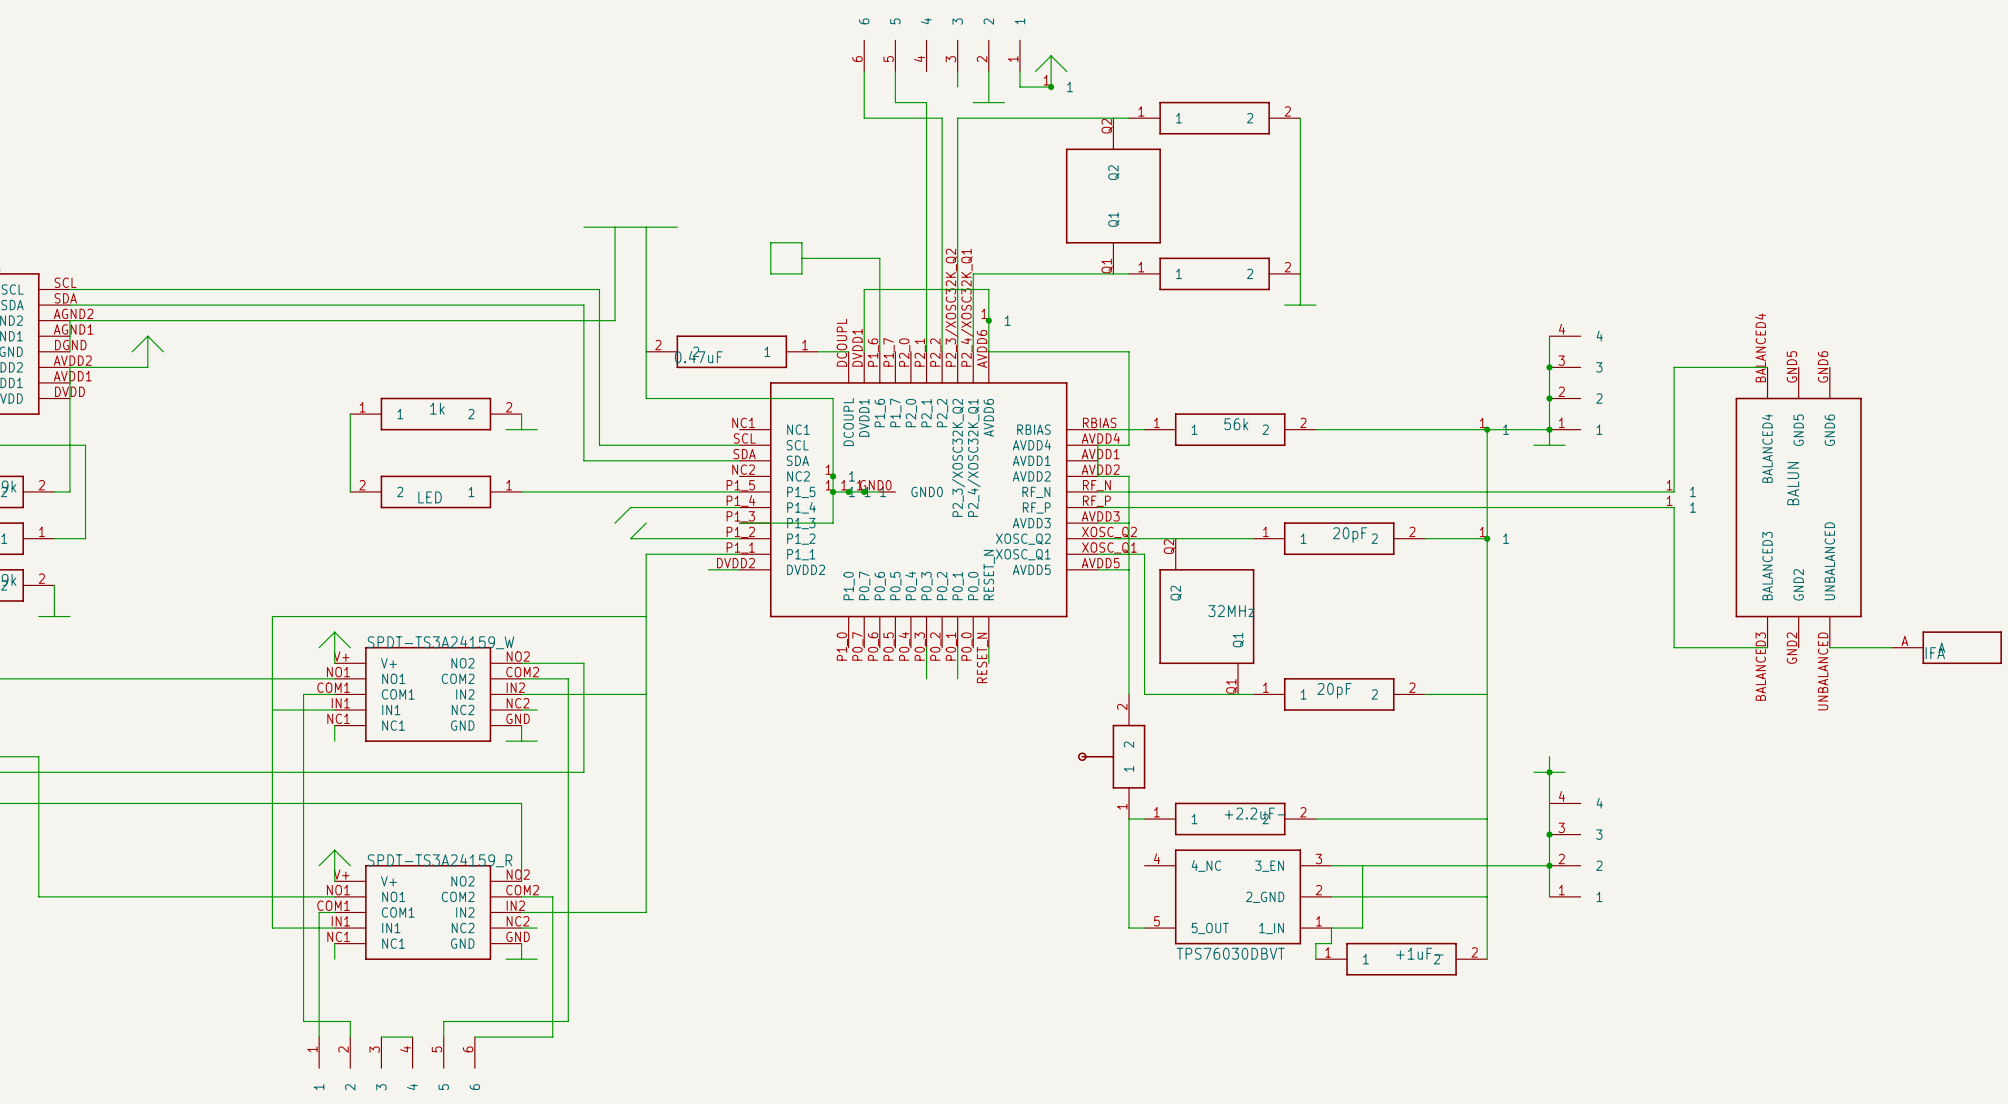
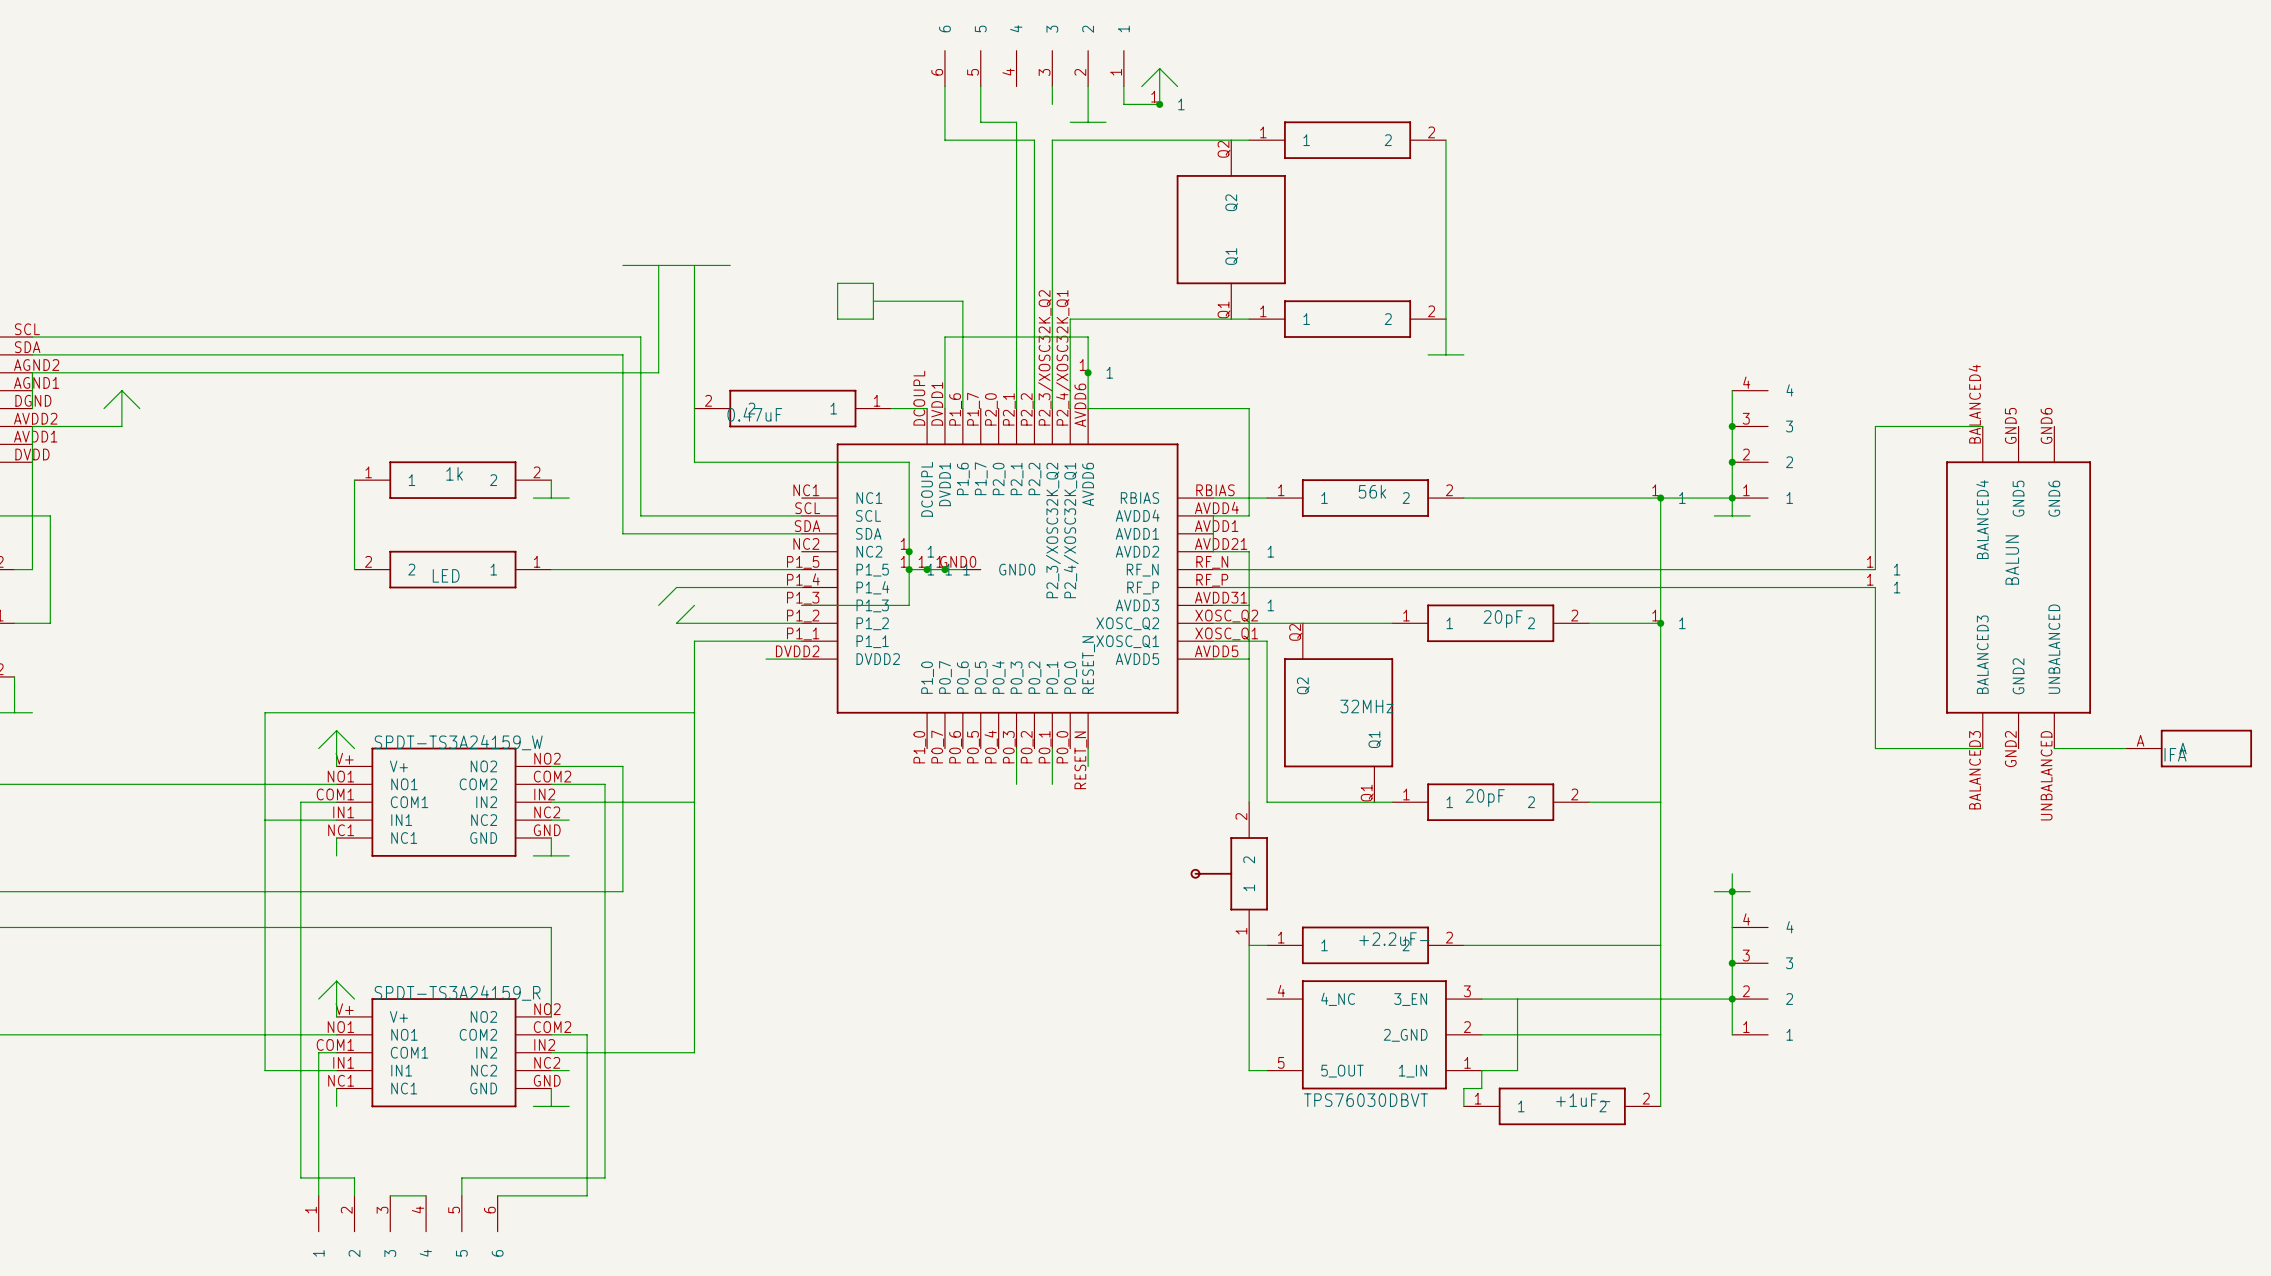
part: none -> (1257, 547)
part: none -> (1257, 601)

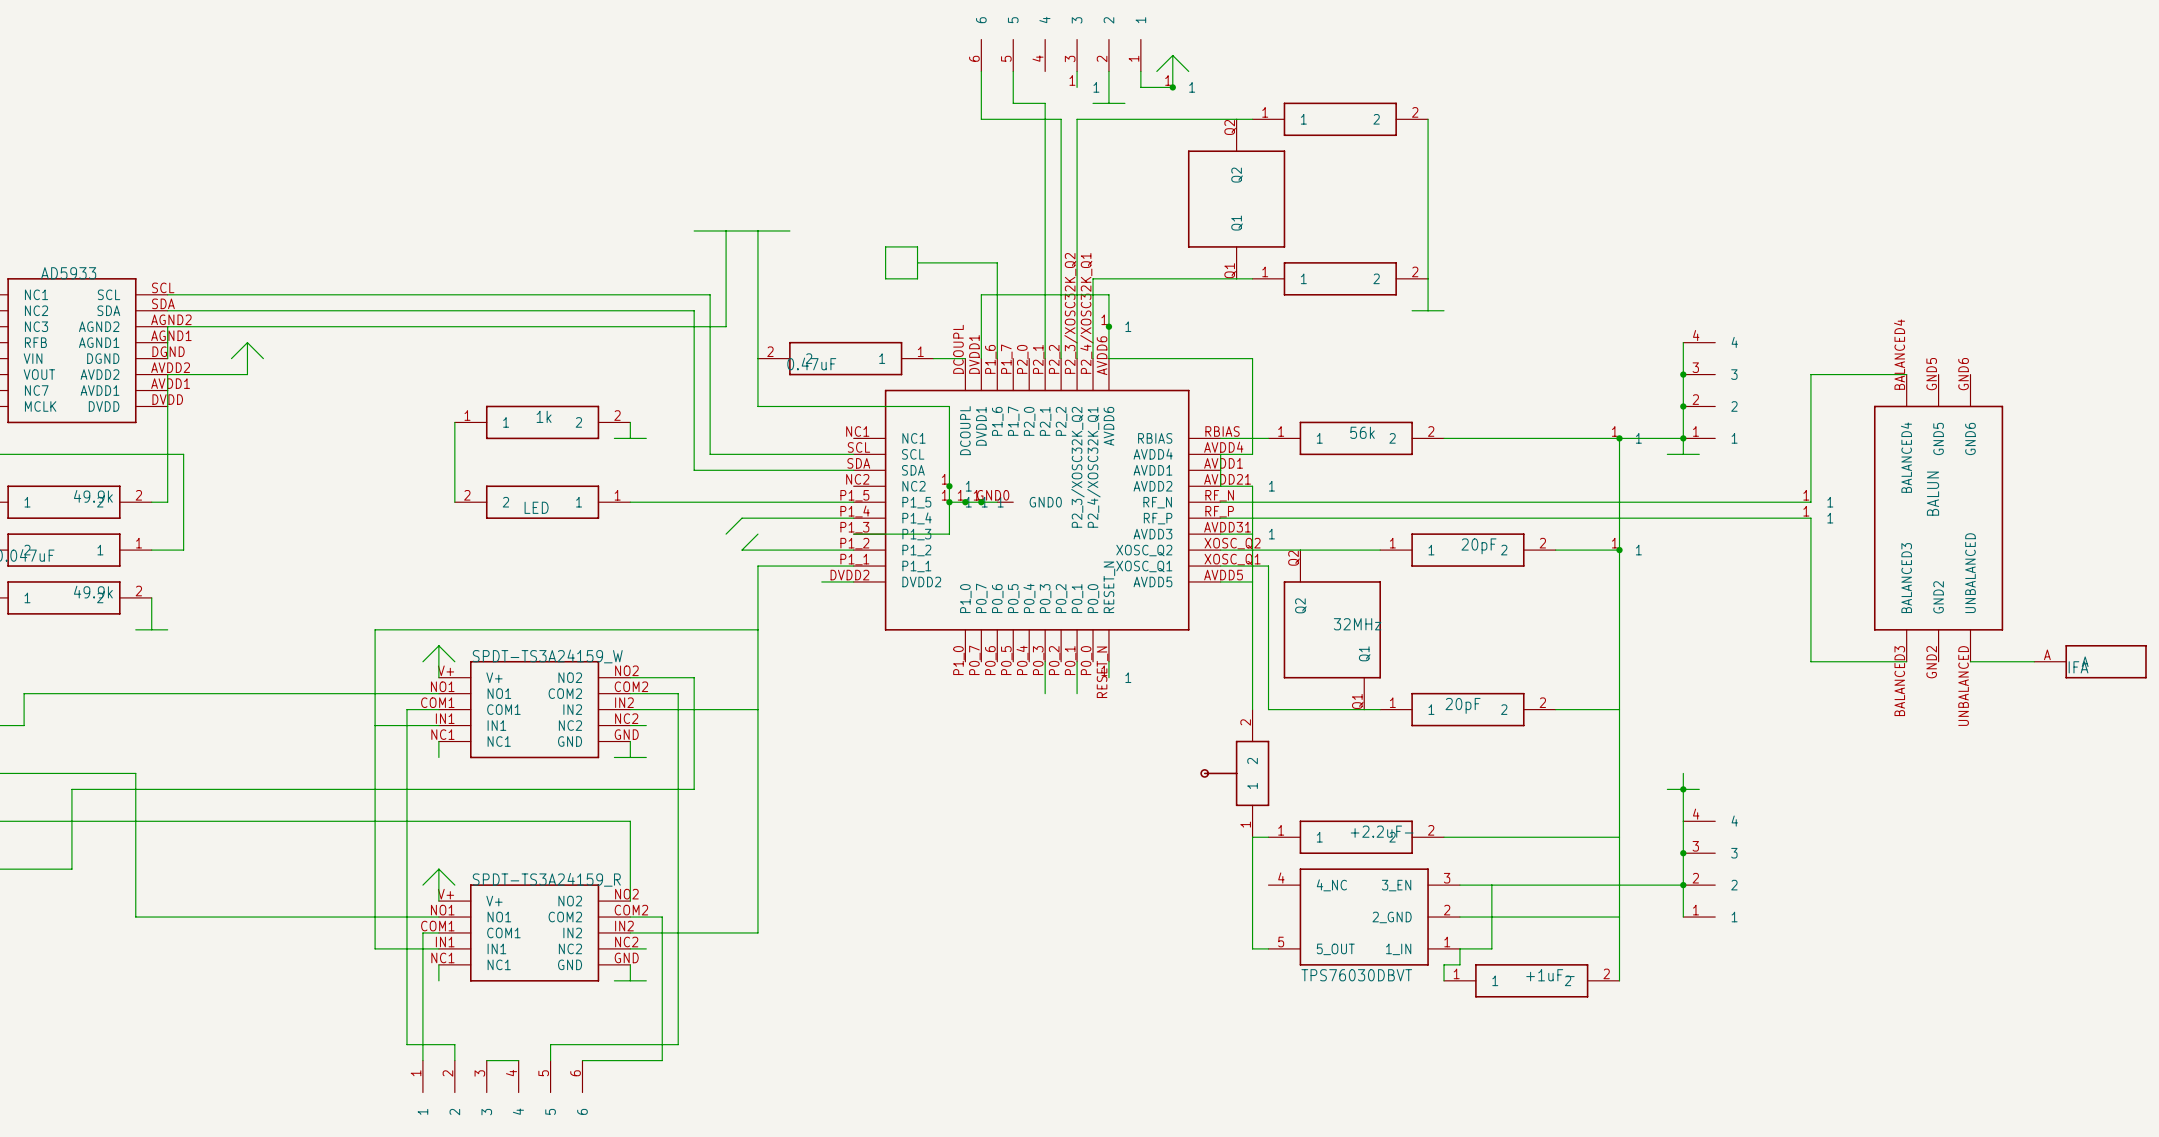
part: none -> (1084, 83)
part: none -> (1116, 674)

